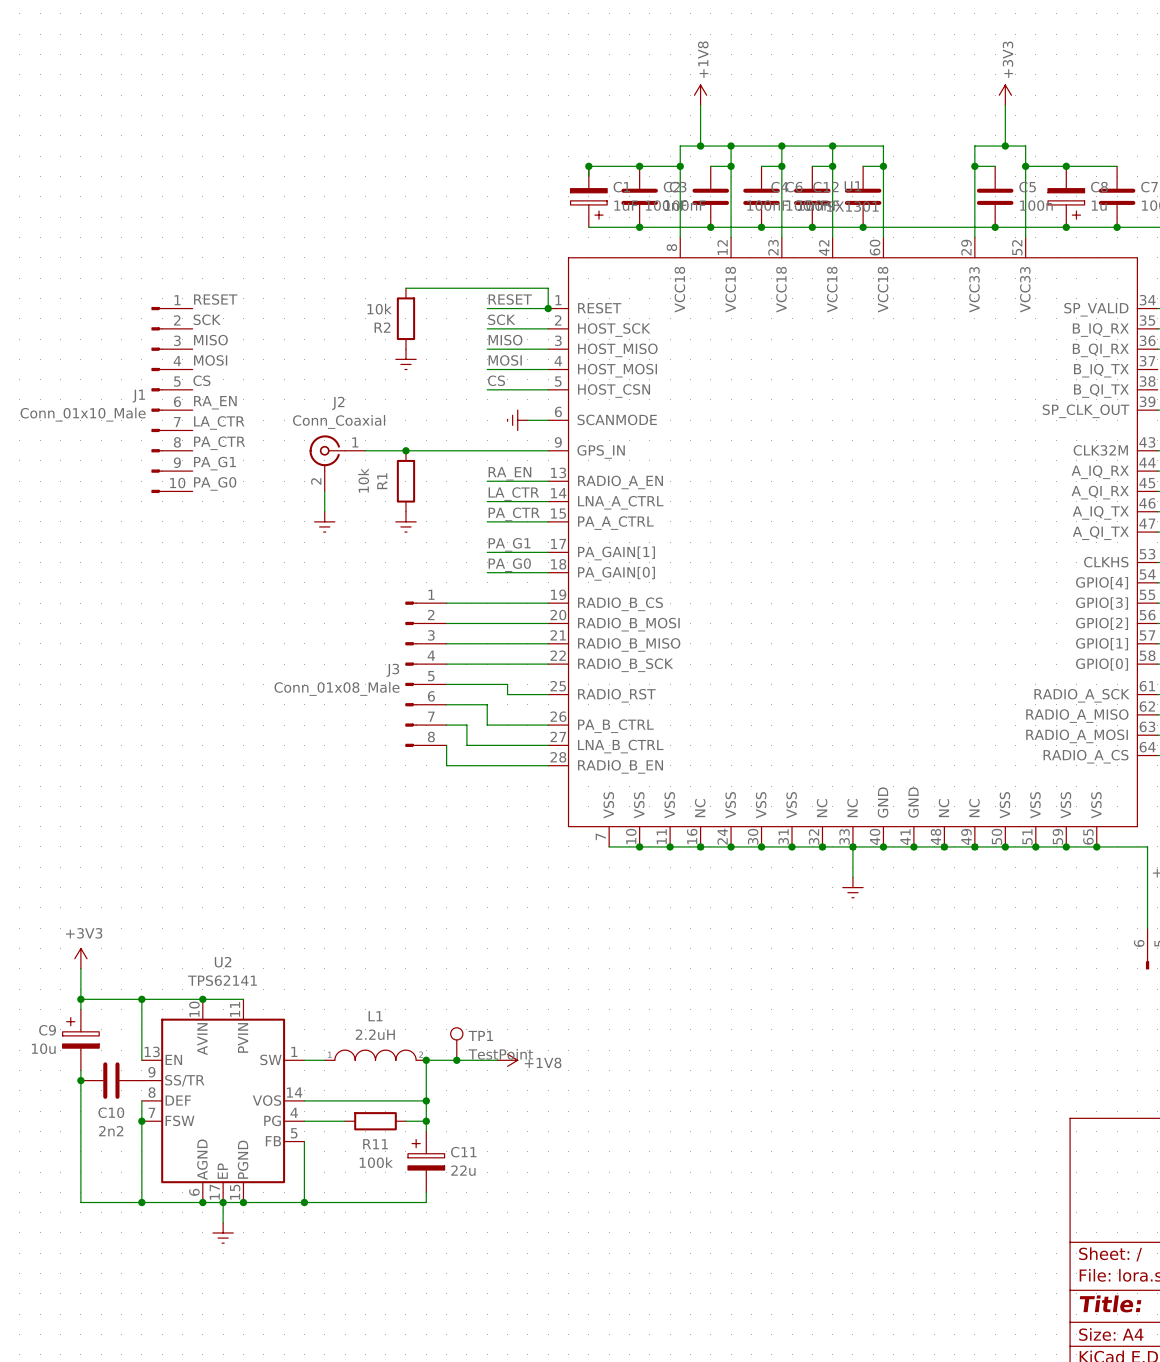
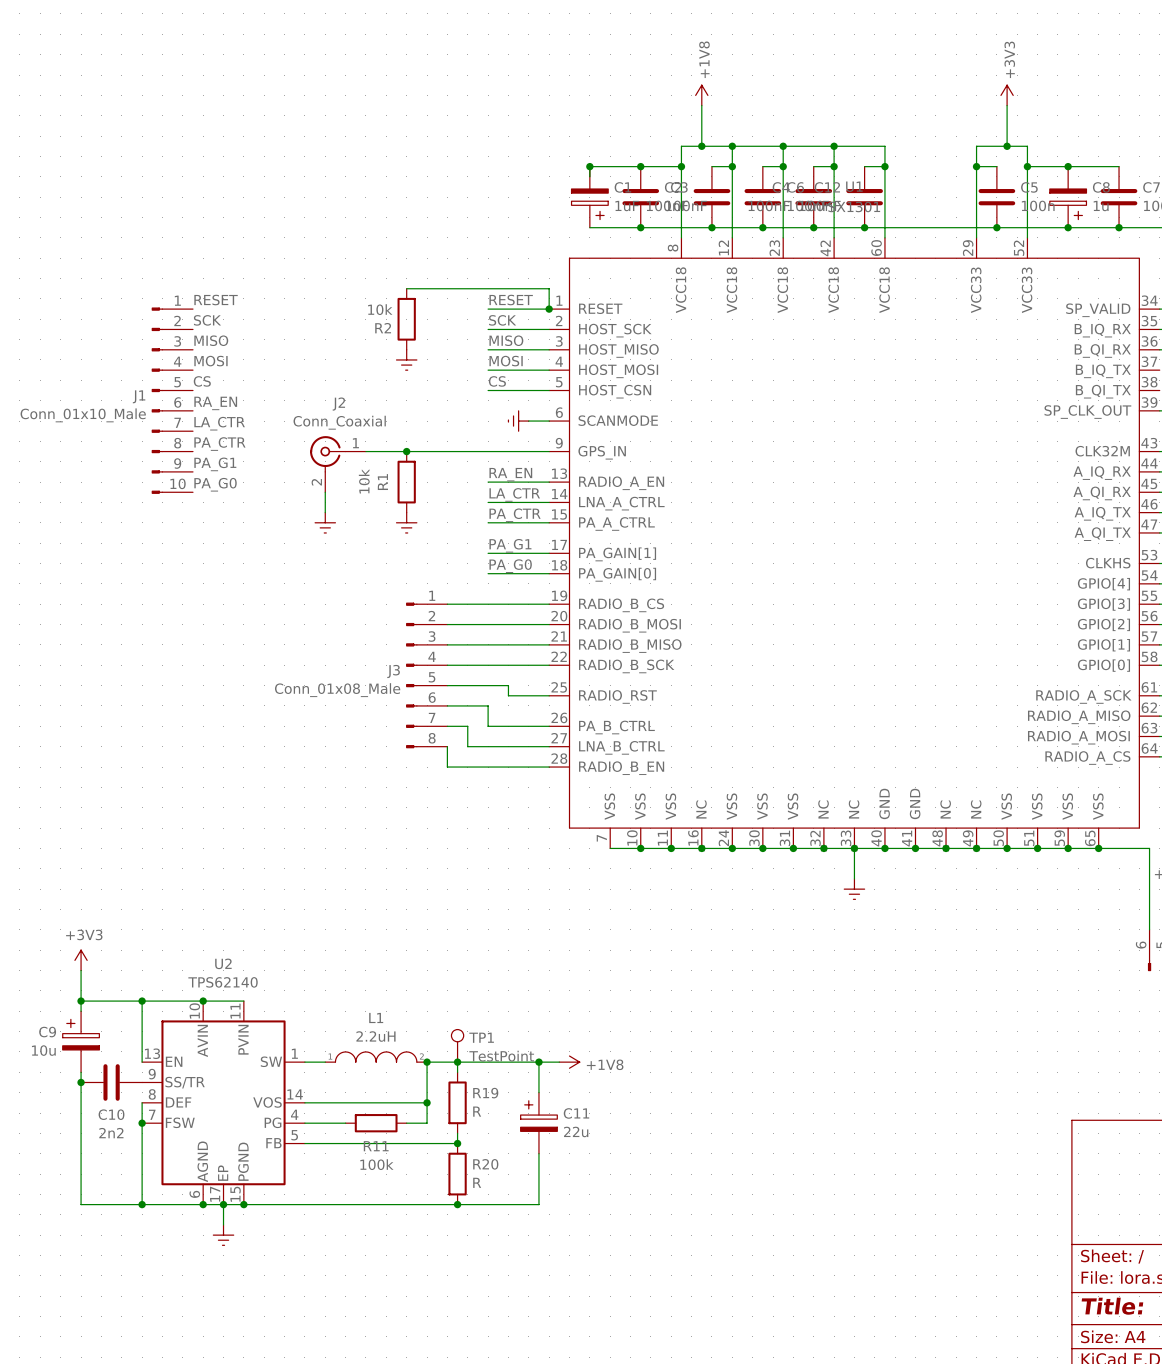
U2 value: TPS62141 (222, 980) -> TPS62140 (223, 982)
wire: none -> (498, 1062) (559, 1062)
power symbol position: +1V8 (507, 1060) -> +1V8 (569, 1062)
wire: none -> (538, 1062) (538, 1092)
junction: none -> (538, 1062)
R19: none -> R (457, 1102)
wire: (426, 1121) (426, 1131) -> (457, 1062) (457, 1072)
junction position: (426, 1121) -> (457, 1143)
wire: (304, 1141) (304, 1202) -> (304, 1143) (457, 1143) (457, 1133)
C11 position: (426, 1161) -> (538, 1123)
R20: none -> R (457, 1174)
wire: (426, 1192) (426, 1202) -> (538, 1153) (538, 1204) (427, 1204)
junction: (304, 1202) -> none
junction: none -> (457, 1204)

